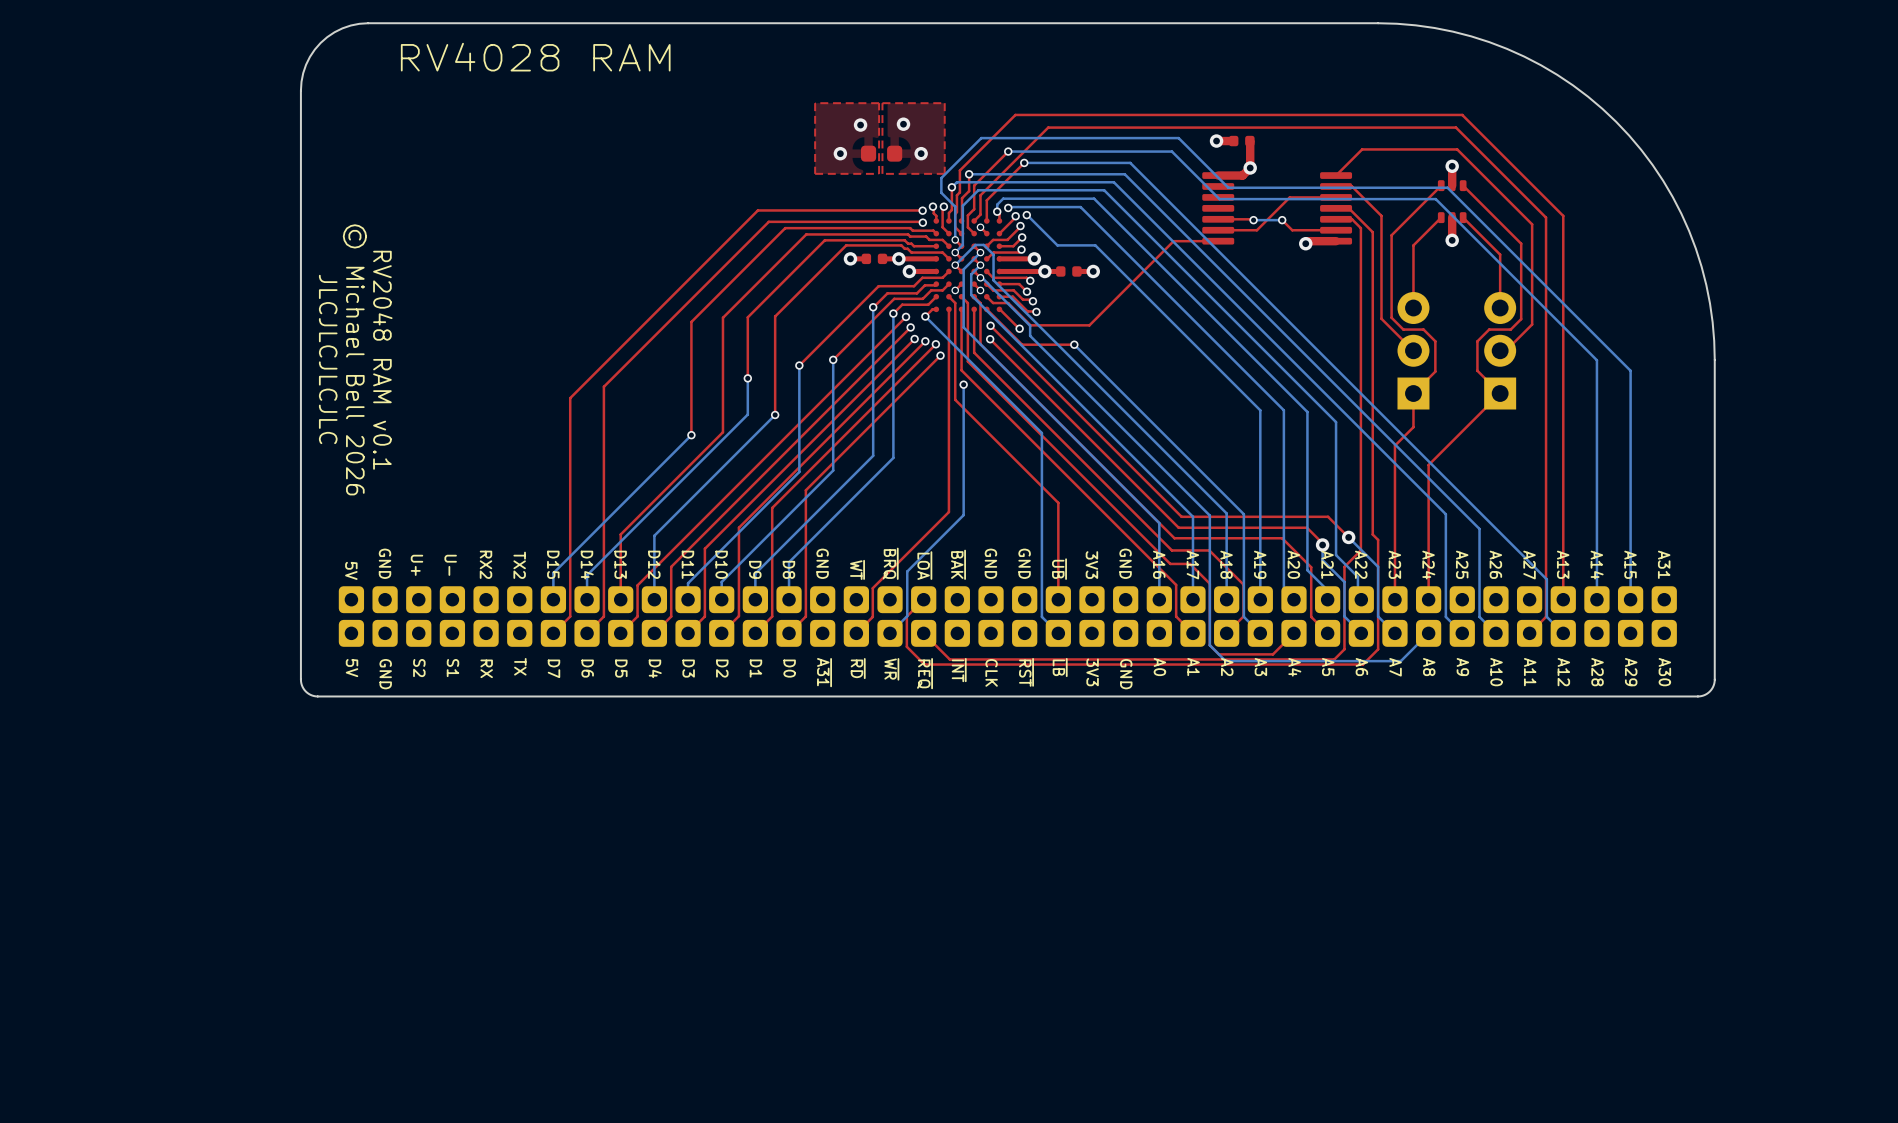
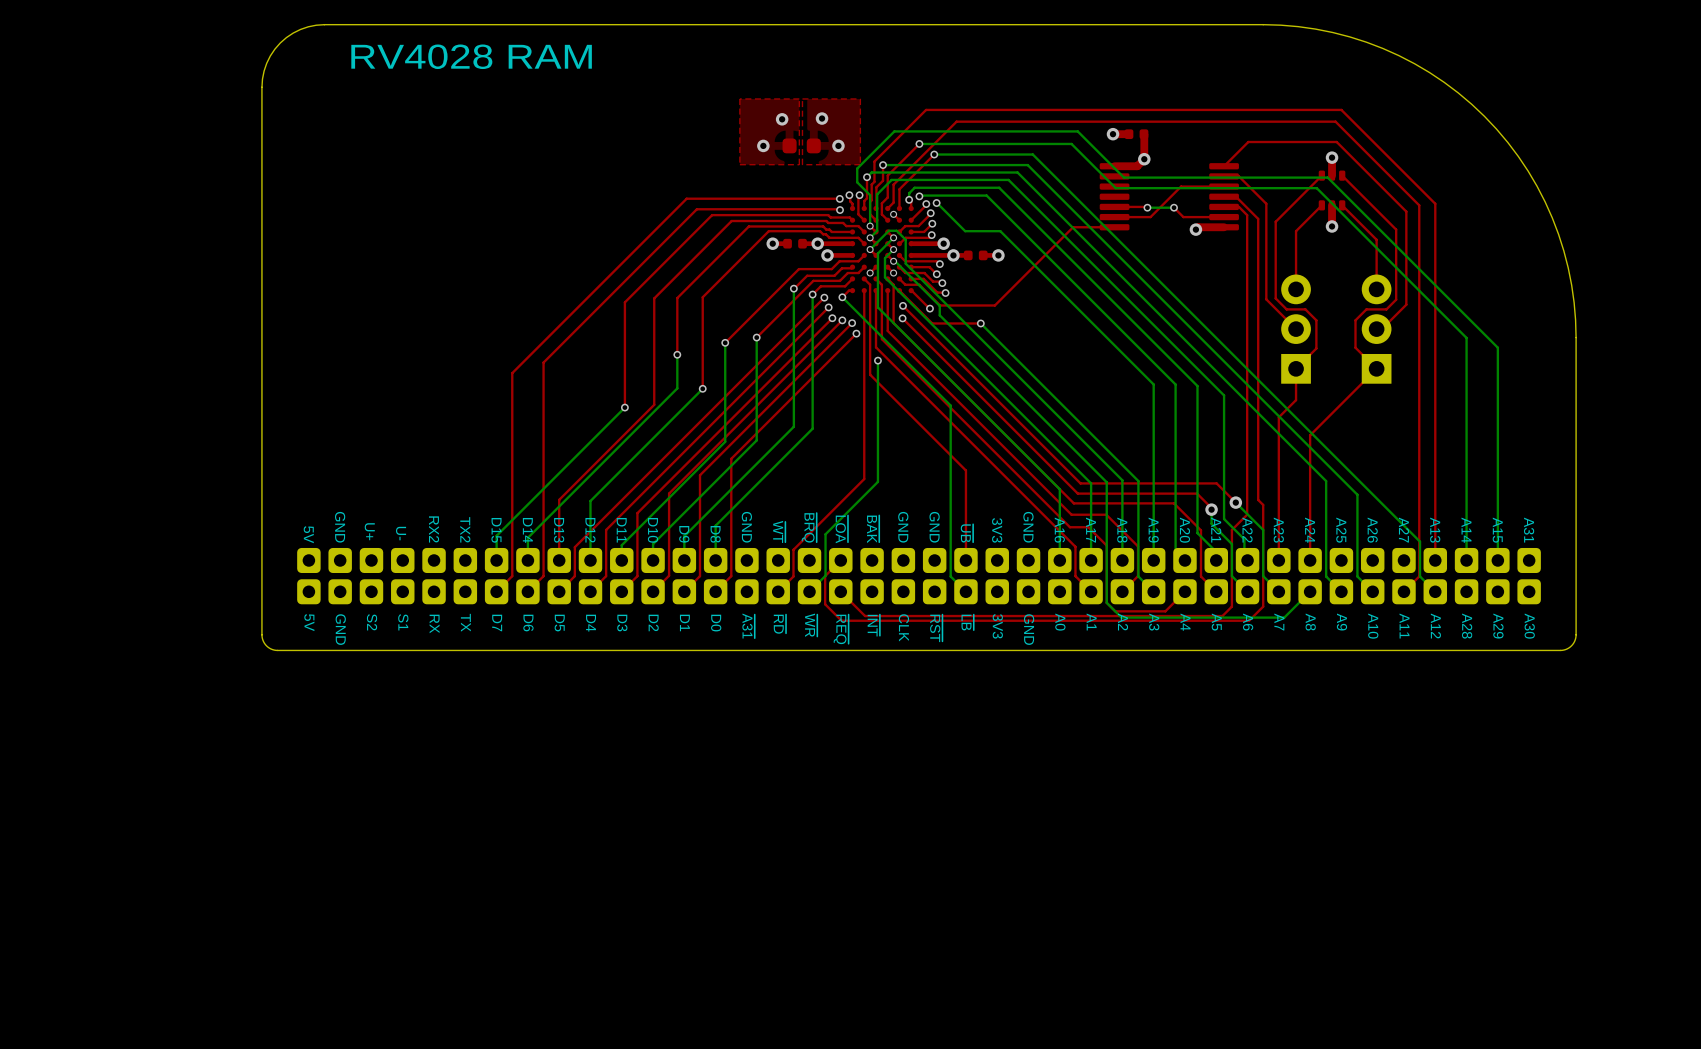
text: JLCJLCJLCJLC (328, 359) -> none
text: © Michael Bell 2026 (354, 359) -> none
text: RV2048 RAM v0.1 (382, 360) -> none

